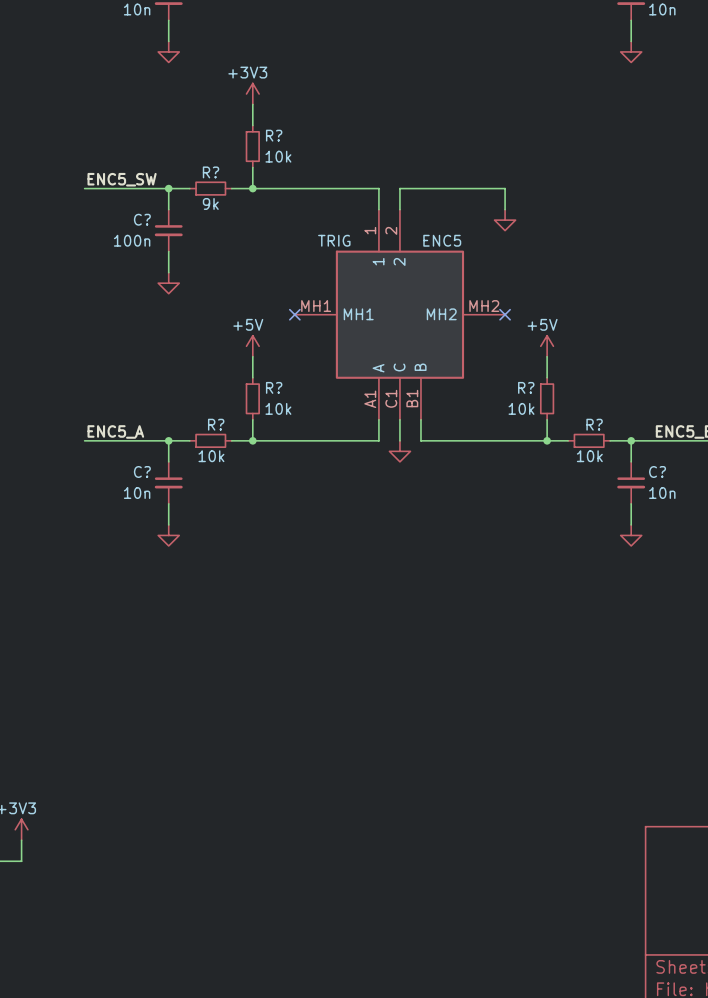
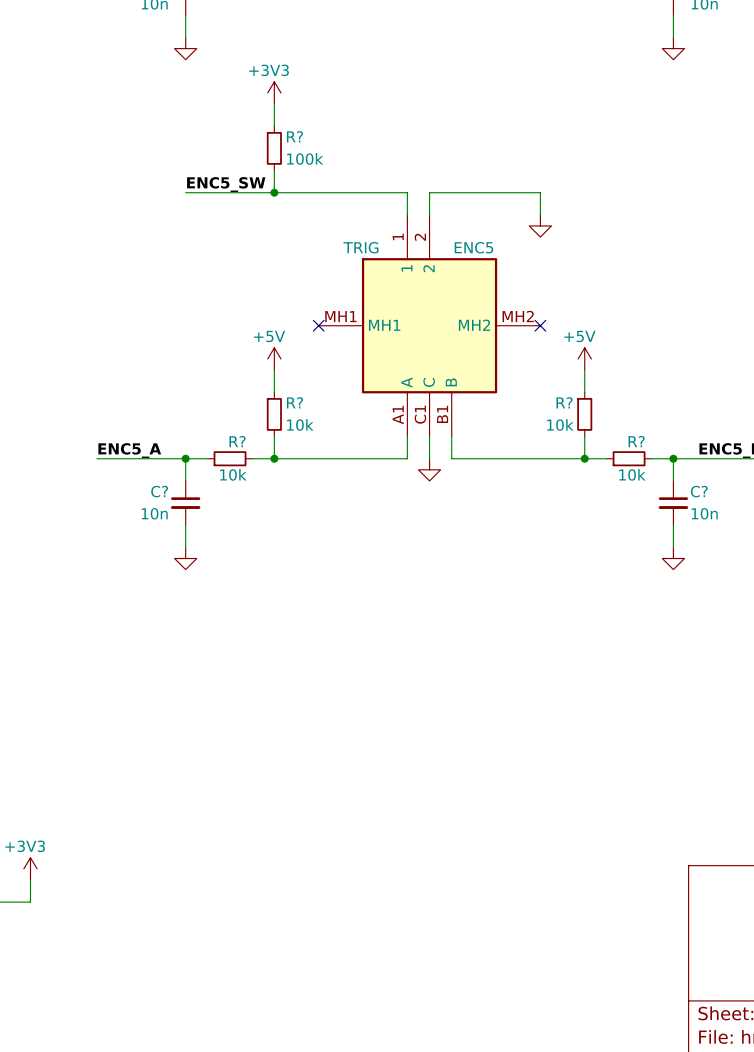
R? value: 10k (278, 156) -> 100k (305, 158)
label position: ENC5_SW (122, 179) -> ENC5_SW (226, 184)
wire: (84, 188) (168, 188) (168, 209) -> none
junction: (168, 188) -> none
wire: none -> (207, 192) (252, 192)
R?: 9k (210, 188) -> none
C?: 100n (168, 230) -> none
wire: (168, 251) (168, 272) -> none
power symbol: (168, 283) -> none

